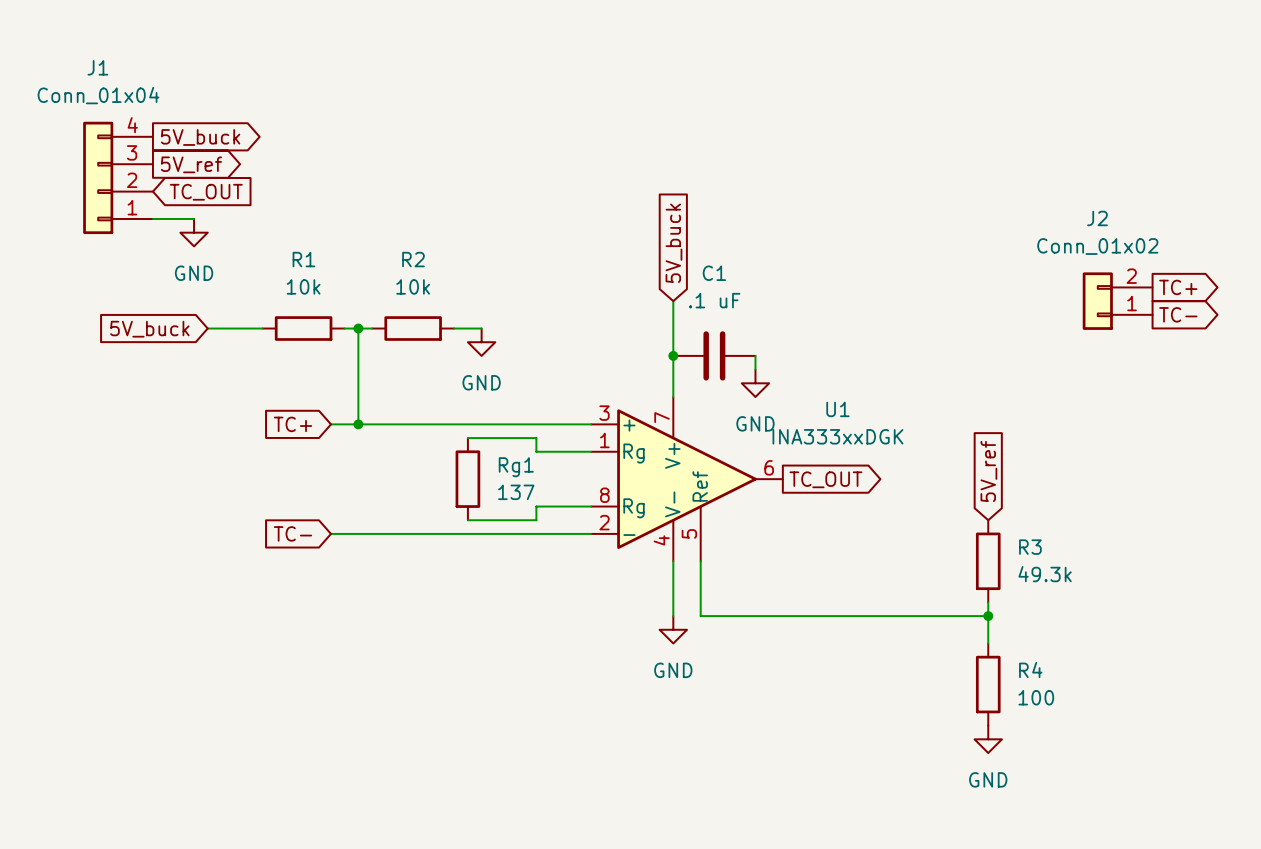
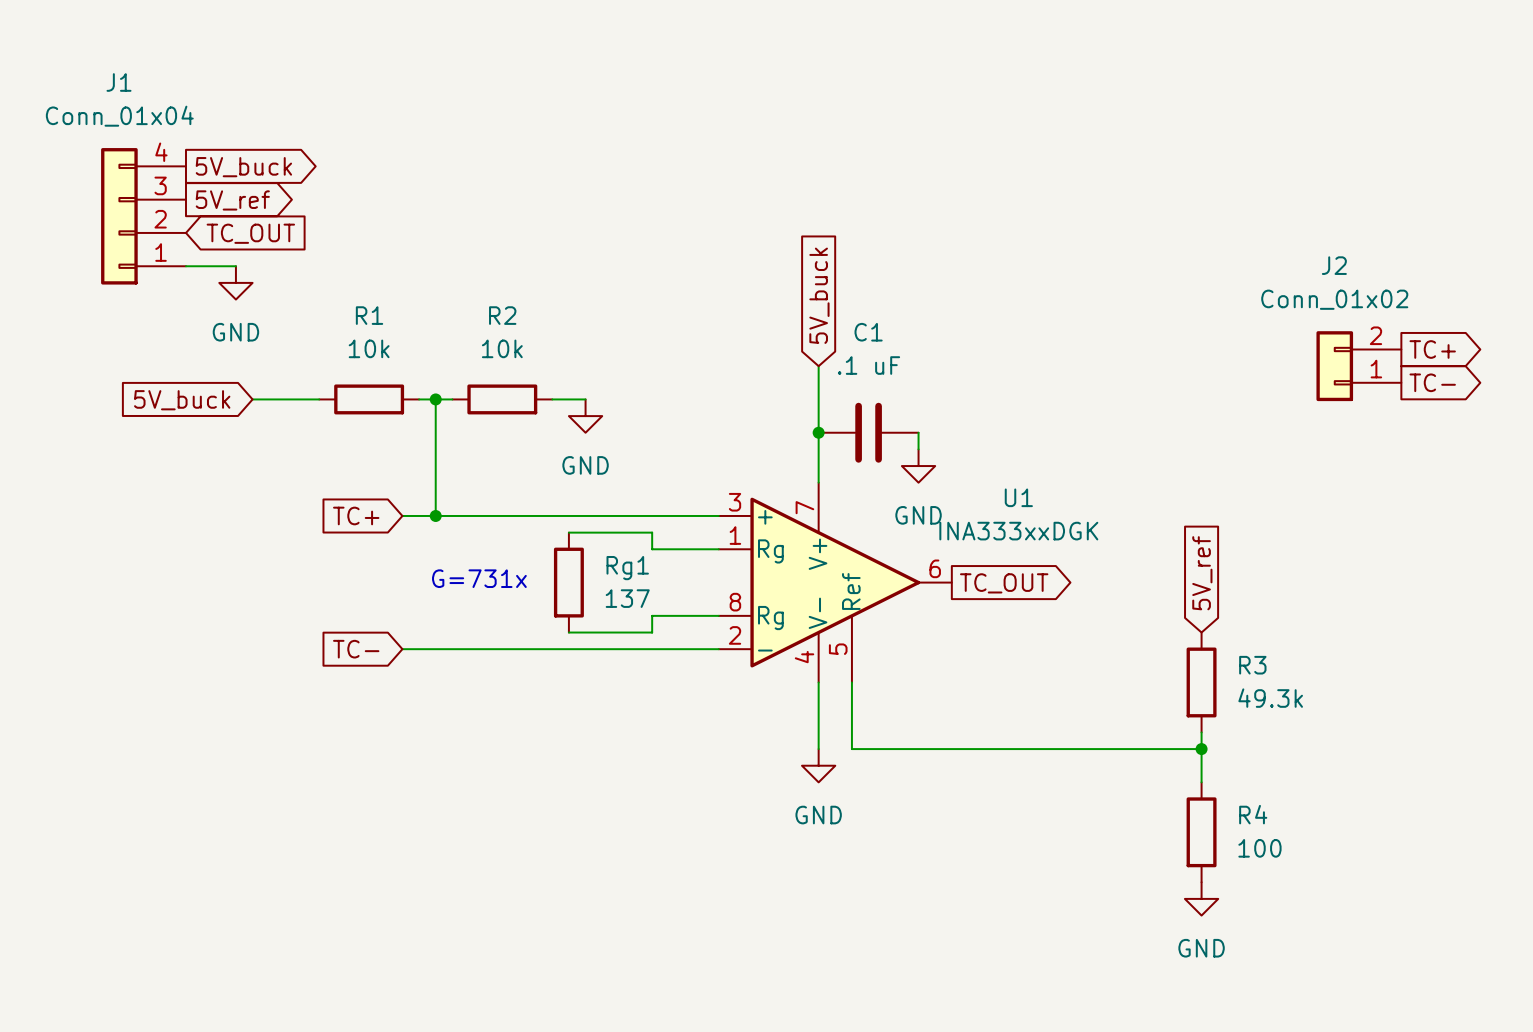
text: none -> G=731x (479, 578)

